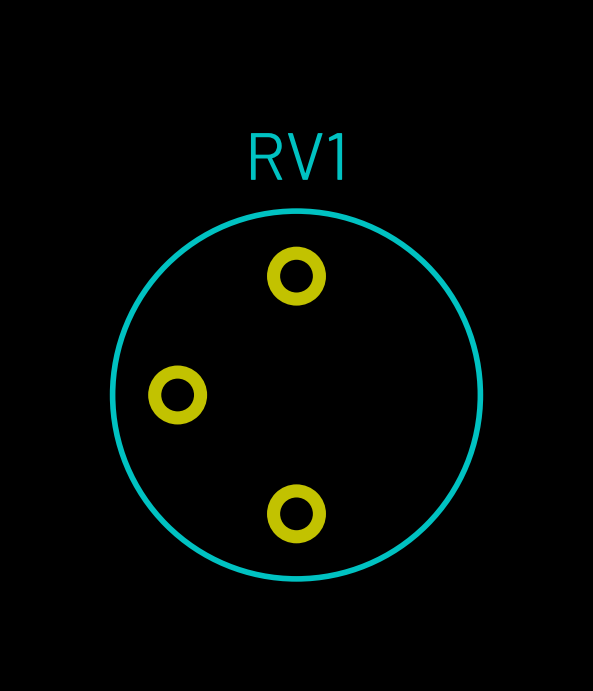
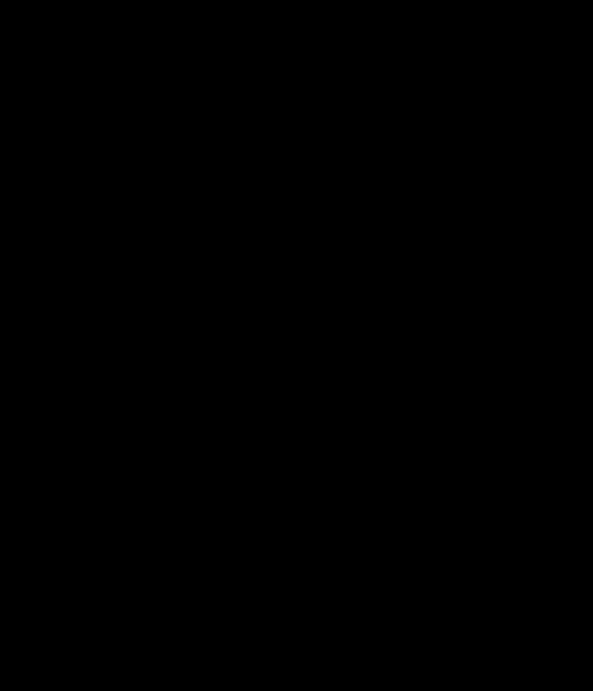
RV1: (296, 394) -> none

